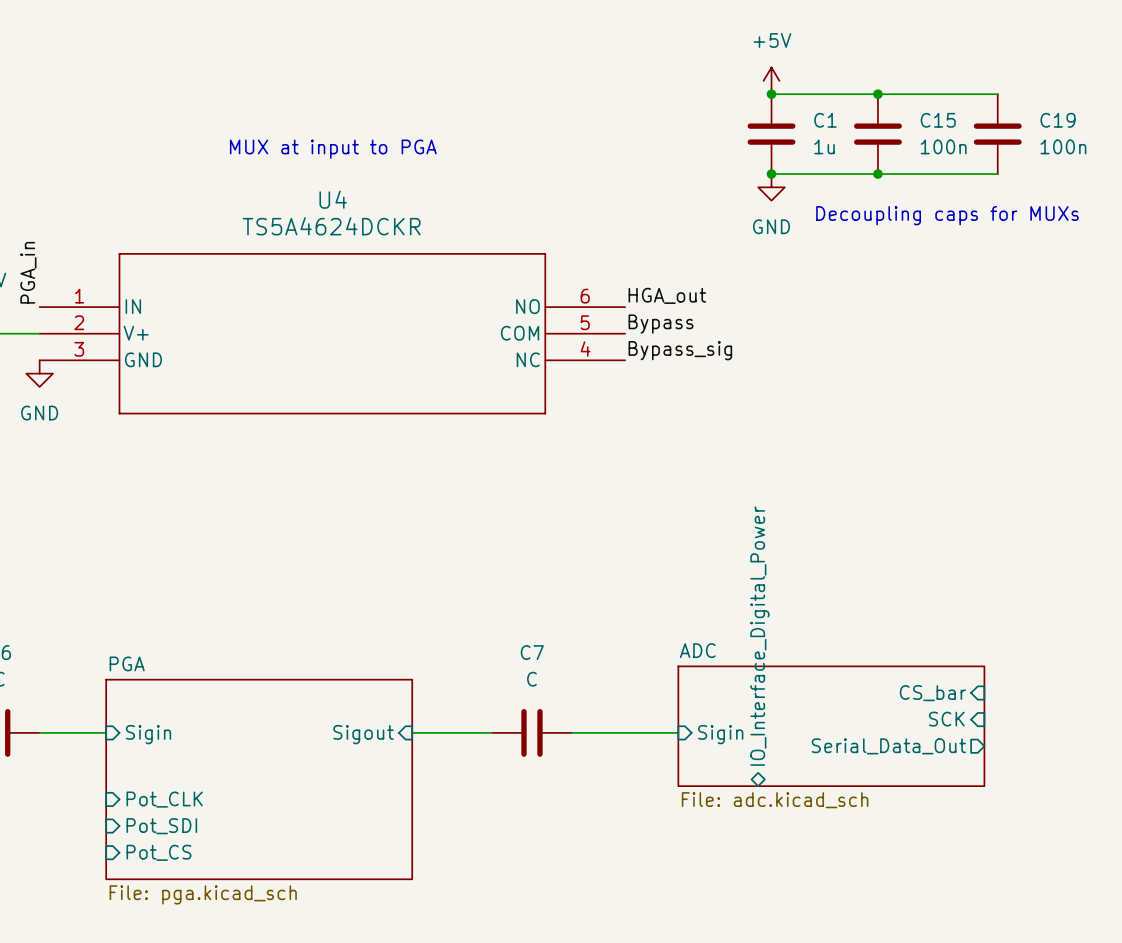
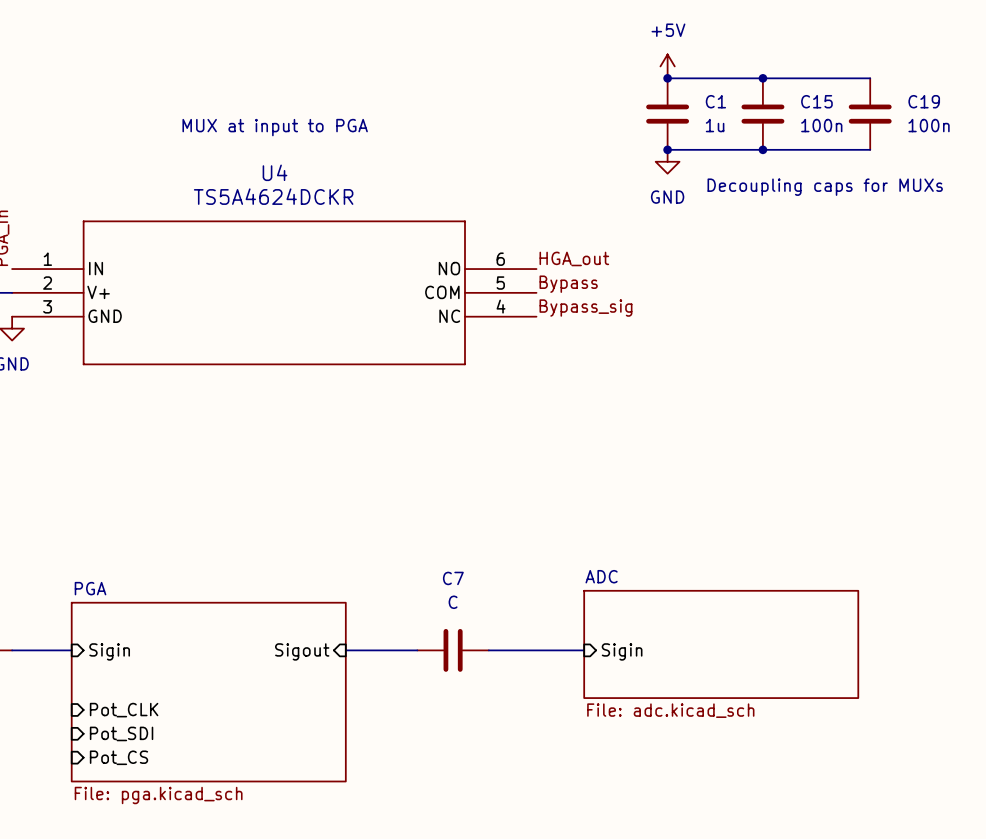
sheet pin: IO_Interface_Digital_Power (759, 636) -> none
sheet pin: CS_bar (932, 693) -> none
sheet pin: SCK (946, 719) -> none
sheet pin: Serial_Data_Out (888, 746) -> none

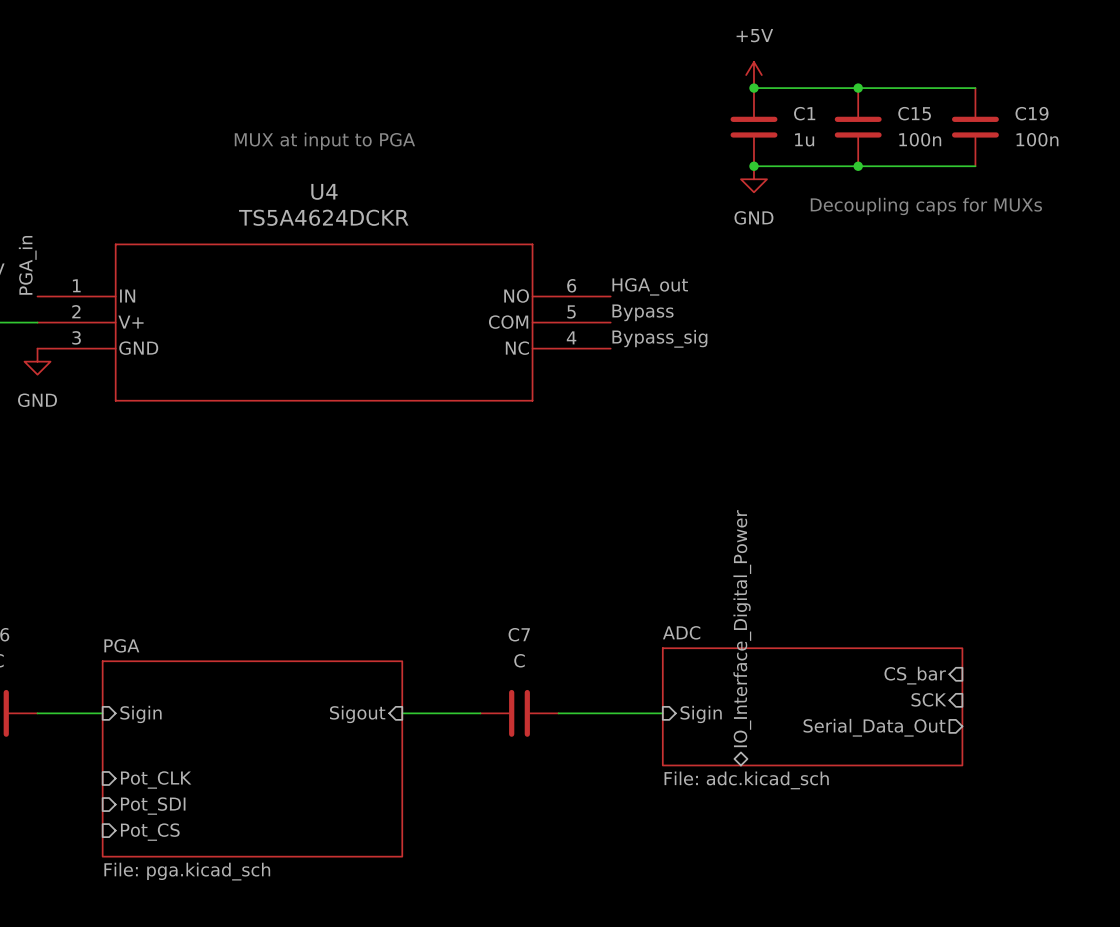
sheet pin: none -> IO_Interface_Digital_Power (742, 628)
sheet pin: none -> CS_bar (915, 675)
sheet pin: none -> SCK (928, 699)
sheet pin: none -> Serial_Data_Out (874, 727)

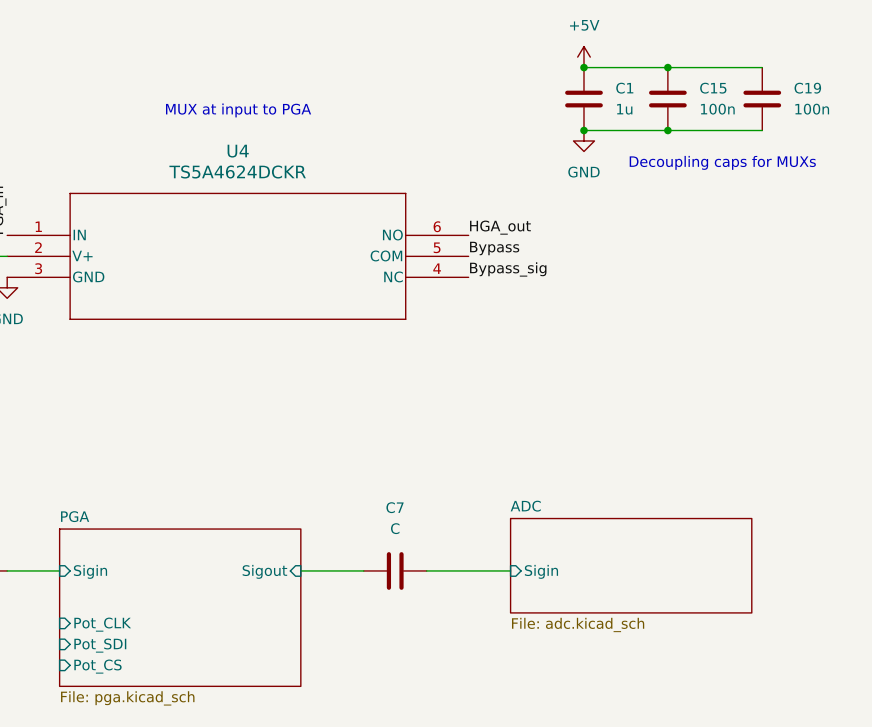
sheet pin: IO_Interface_Digital_Power (742, 628) -> none
sheet pin: CS_bar (915, 675) -> none
sheet pin: SCK (928, 699) -> none
sheet pin: Serial_Data_Out (874, 727) -> none

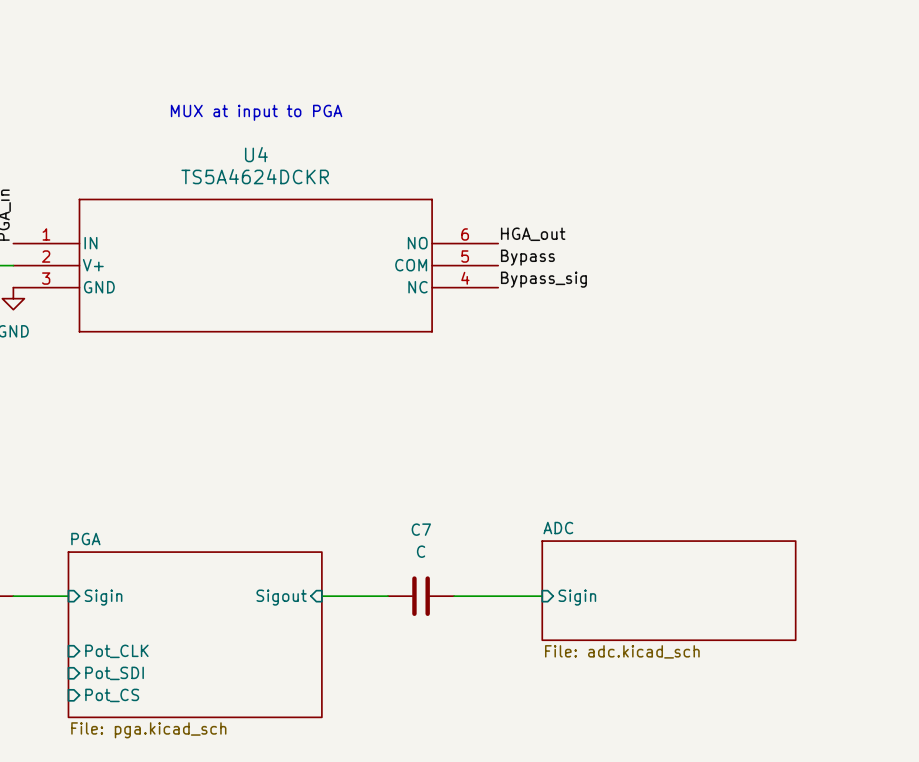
power symbol: +5V (583, 57) -> none
wire: (583, 67) (762, 67) -> none
junction: (583, 67) -> none
junction: (667, 67) -> none
C1: 1u (583, 99) -> none
C15: 100n (667, 99) -> none
C19: 100n (762, 99) -> none
wire: (583, 130) (762, 130) -> none
junction: (583, 130) -> none
junction: (667, 130) -> none
power symbol: GND (583, 140) -> none
text: Decoupling caps for MUXs (722, 162) -> none

